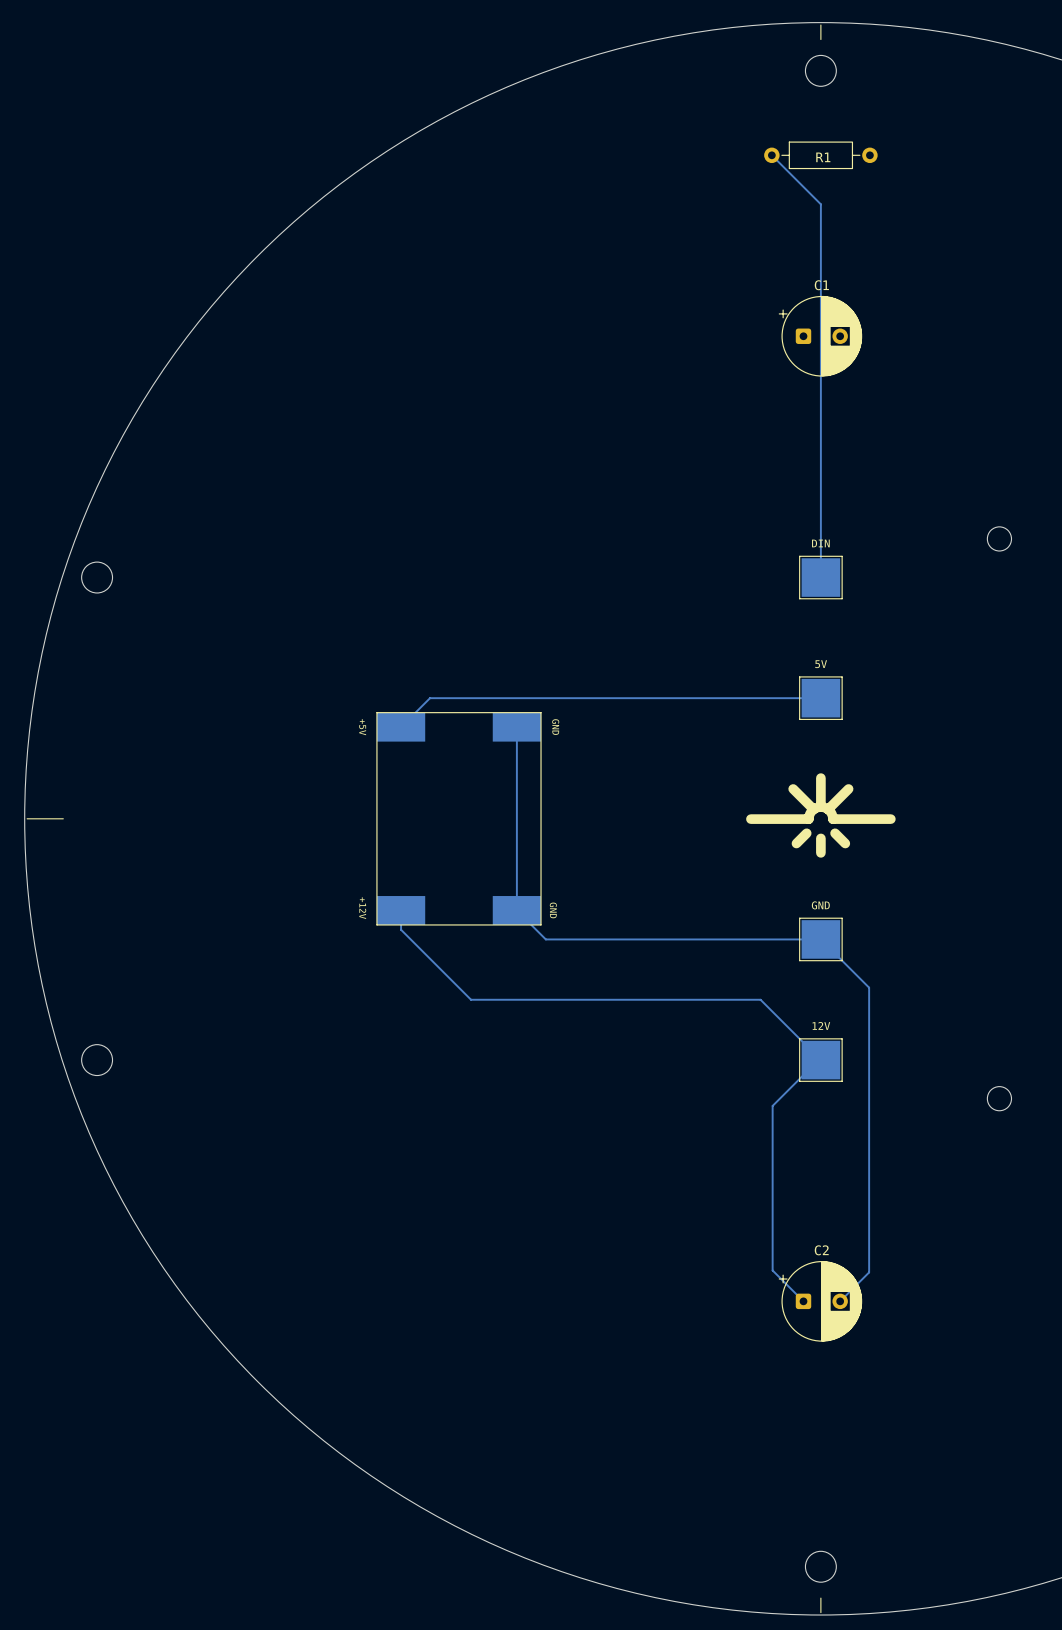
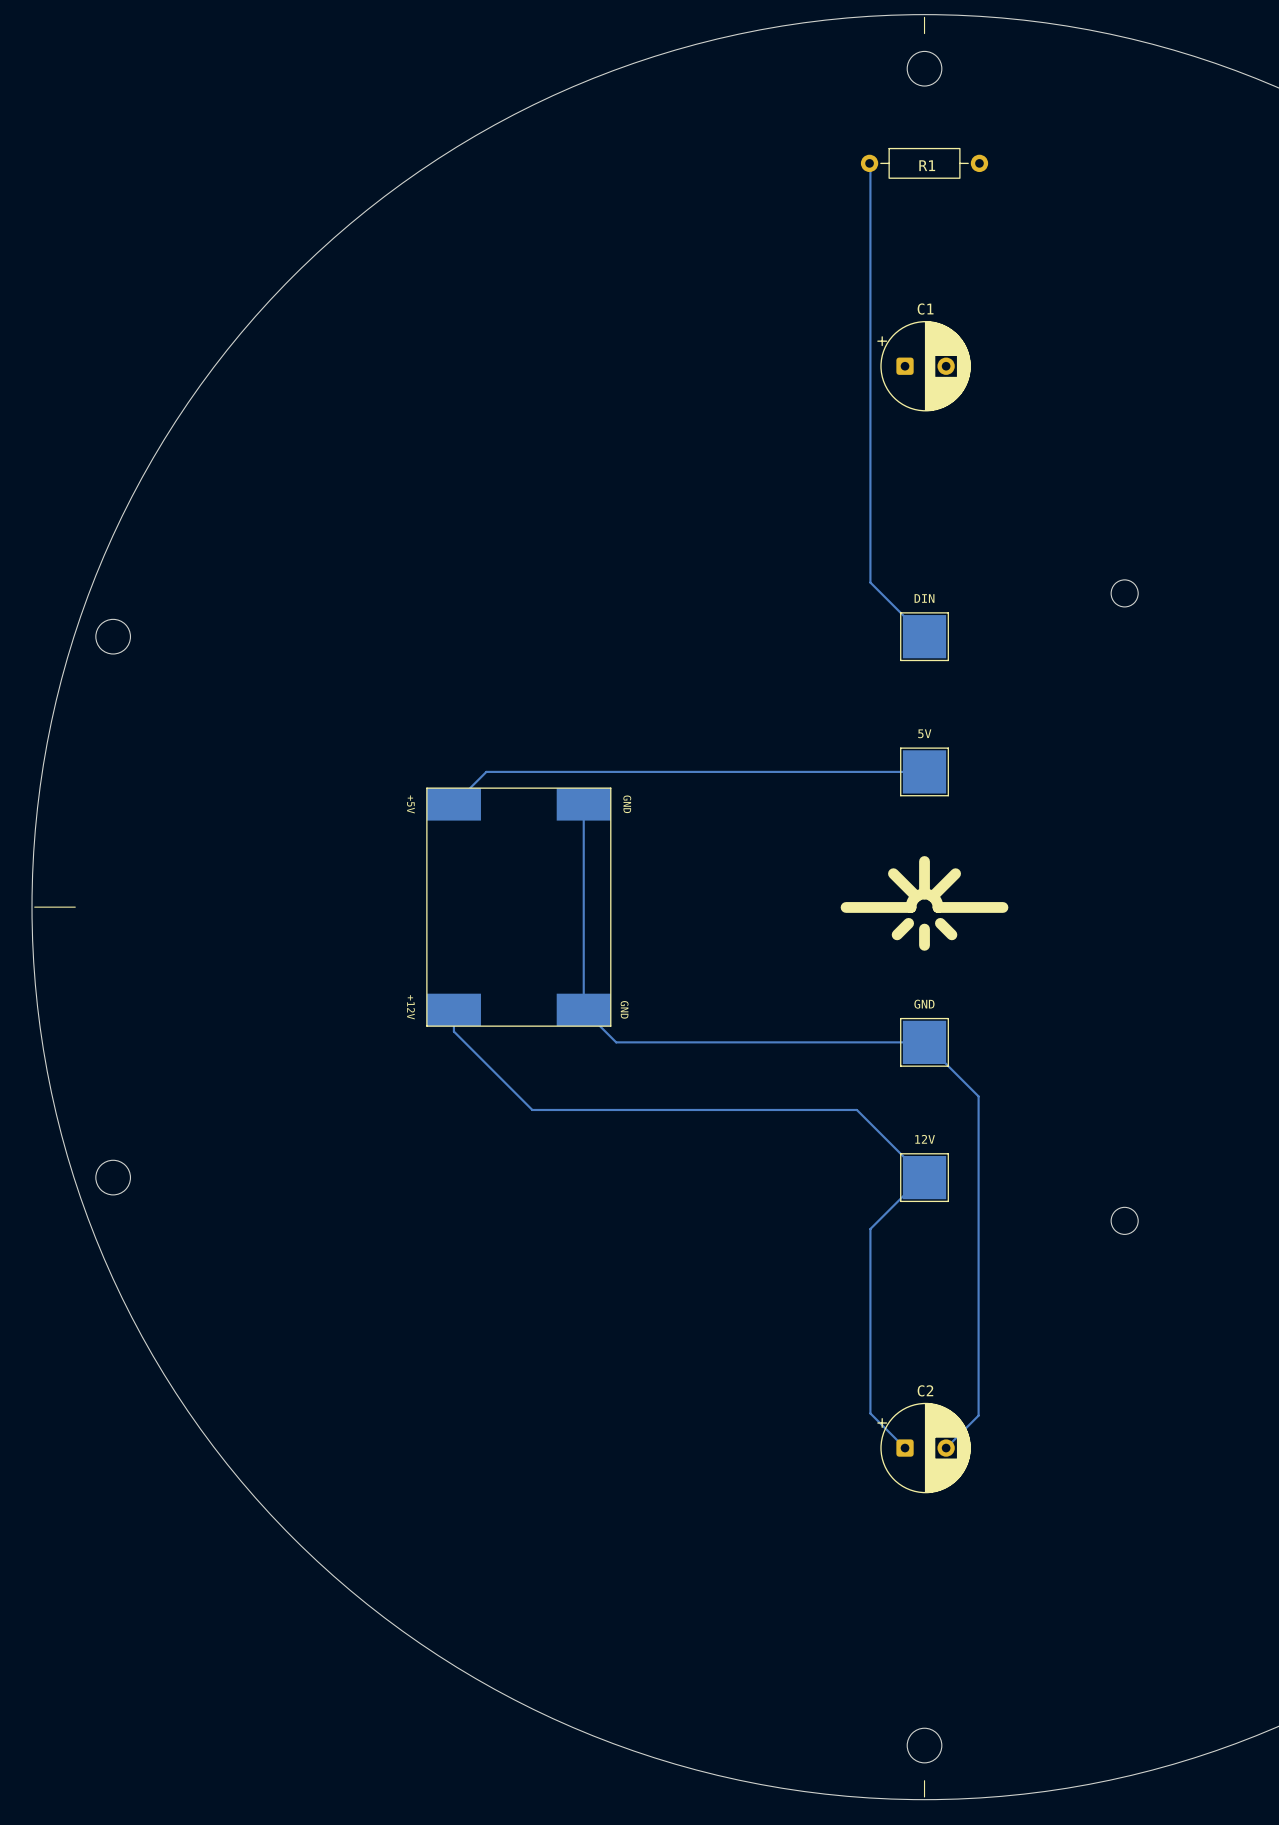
track: (772, 156) (820, 204) (820, 577) -> (870, 164) (870, 582) (924, 636)

